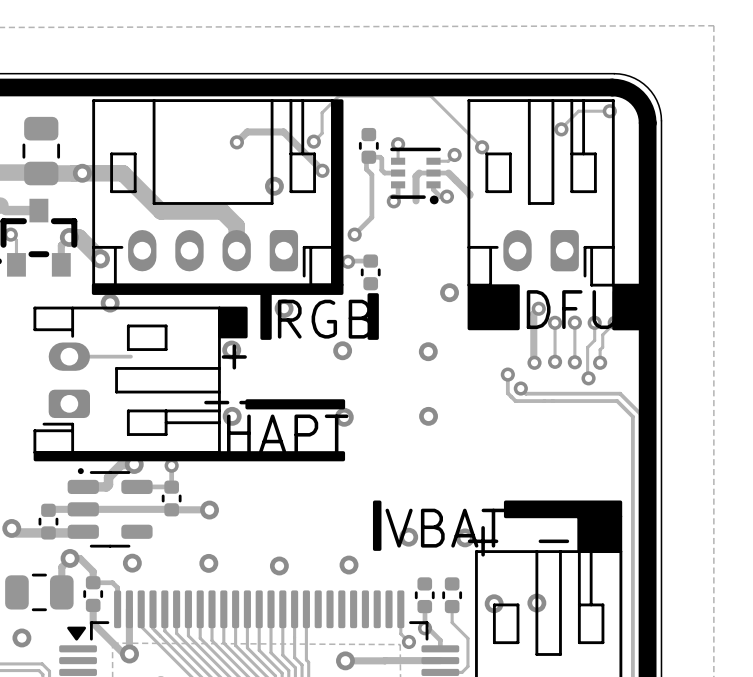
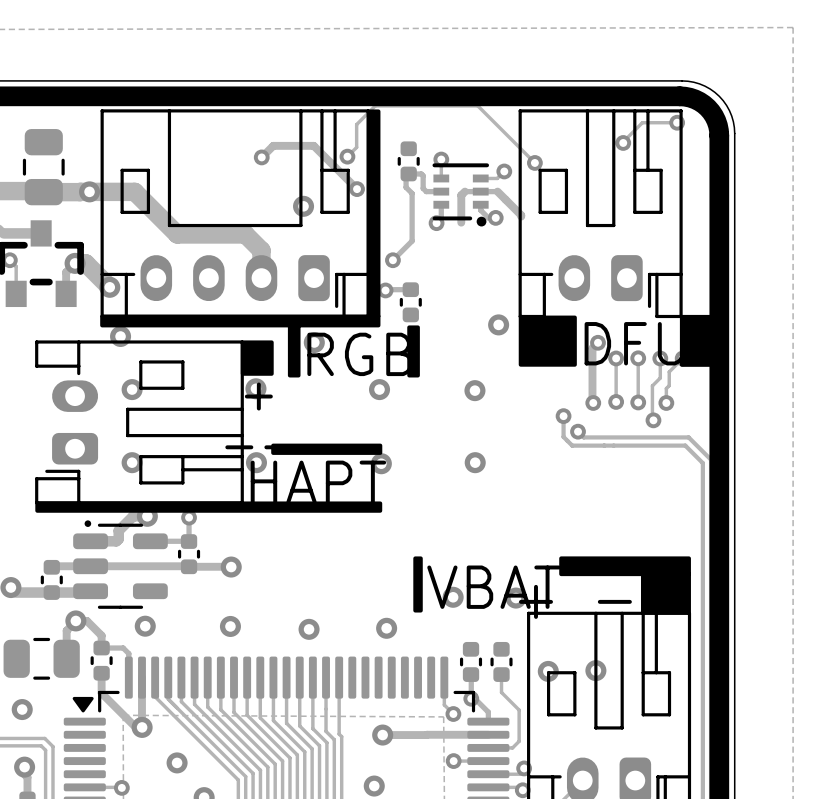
via: none -> (132, 389)
track: (69, 356) (130, 356) -> none
via: none -> (132, 462)

